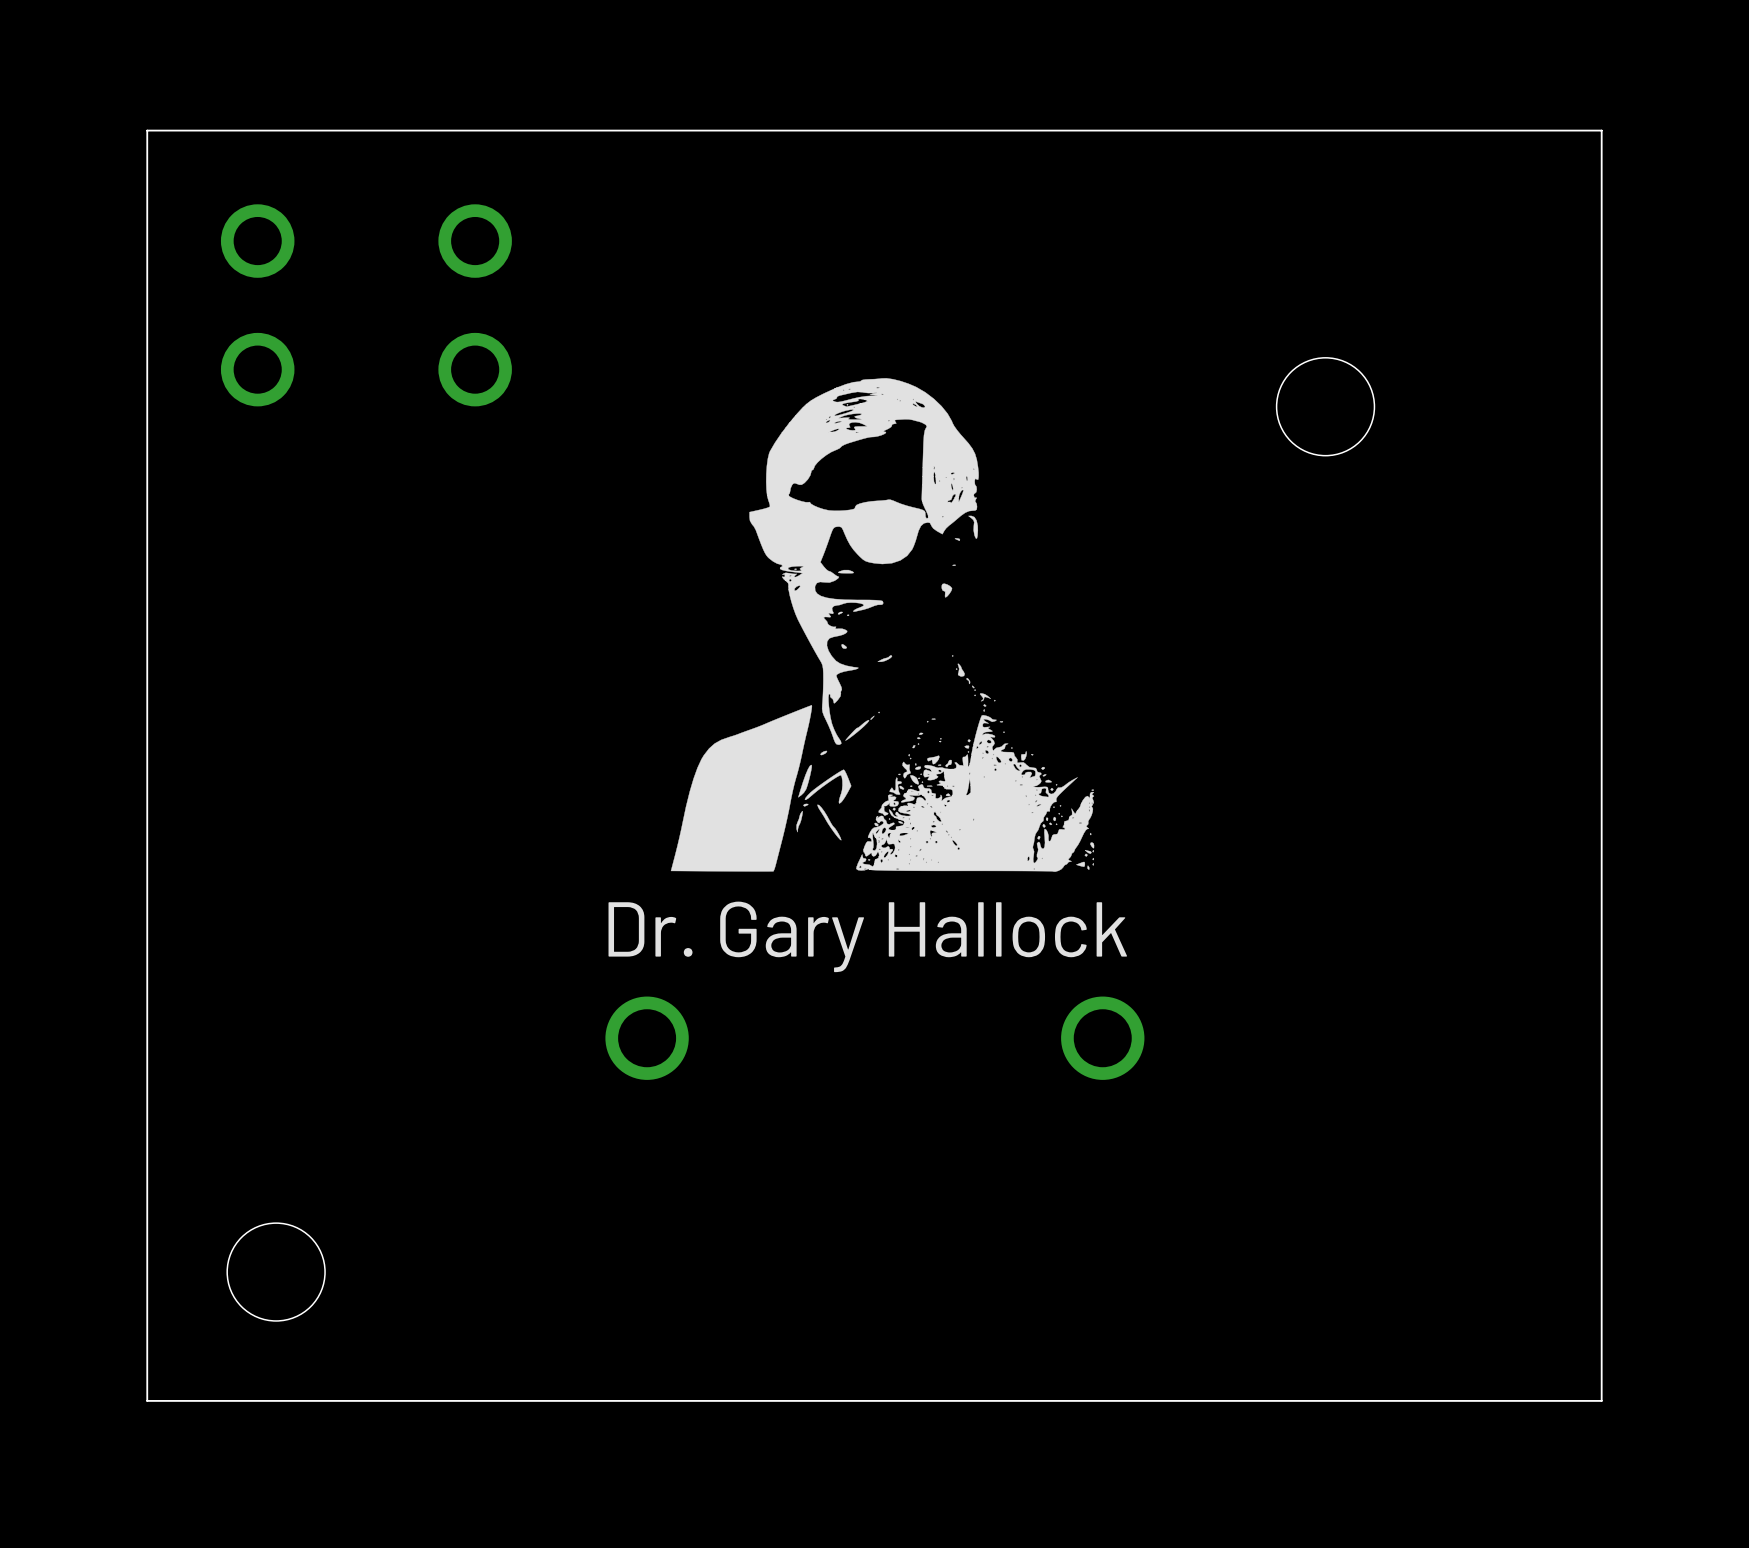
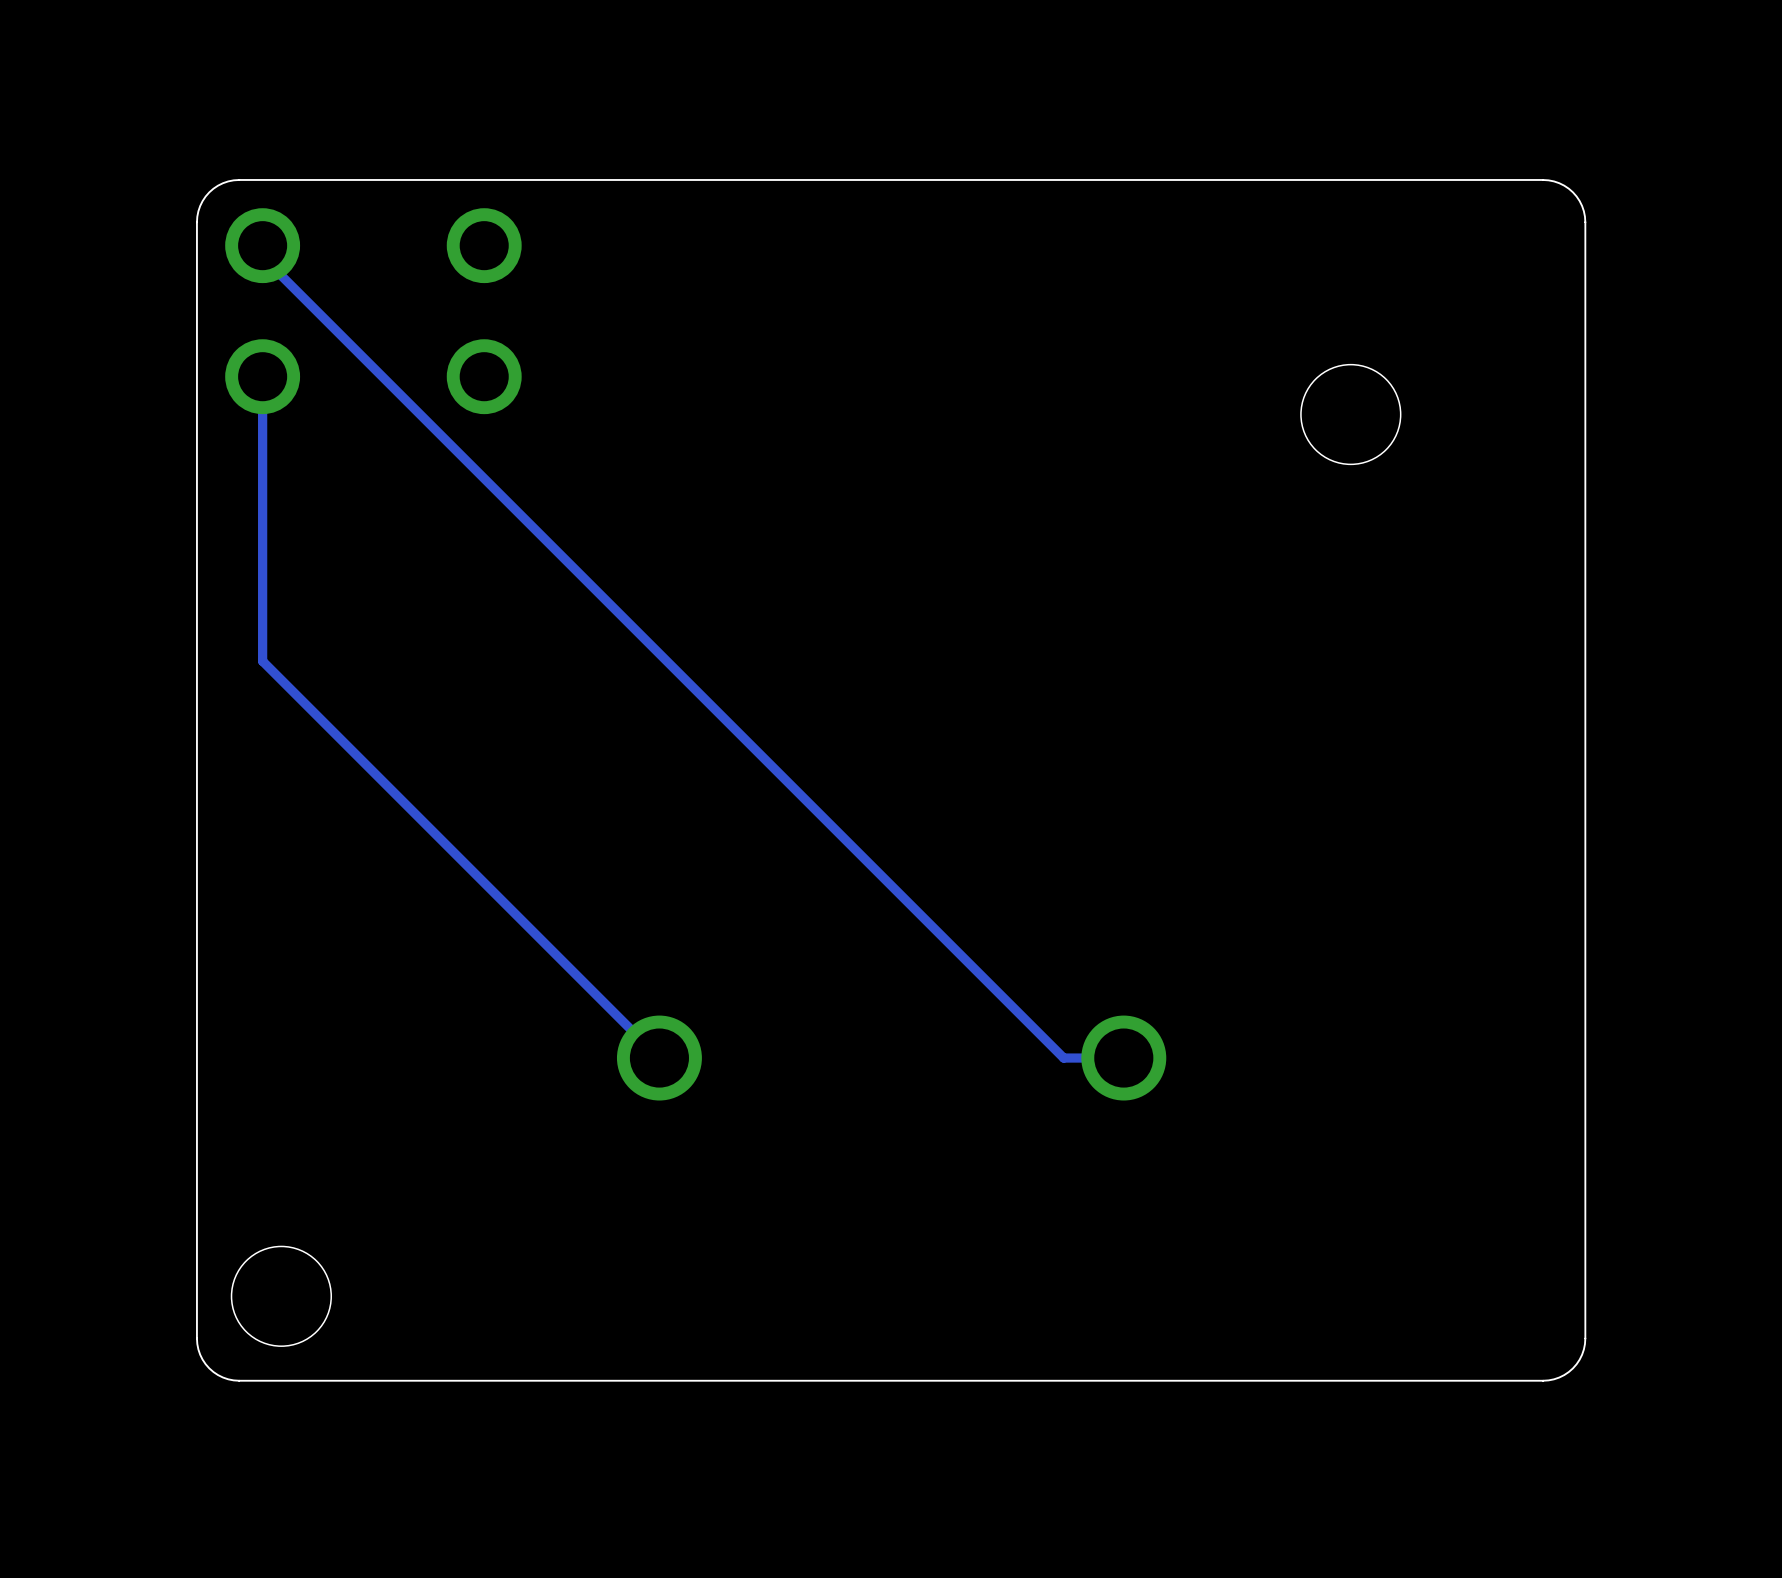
board edge: (1601, 130) (1601, 1400) (147, 1400) (147, 130) (1601, 130) -> (1543, 179) (1559, 183) (1572, 192) (1582, 206) (1585, 222) (1585, 1338) (1582, 1354) (1572, 1368) (1559, 1377) (1543, 1380) (239, 1380) (223, 1377) (209, 1368) (200, 1354) (196, 1338) (196, 222) (200, 206) (209, 192) (223, 183) (239, 179) (1543, 179)
track: none -> (262, 245) (262, 256) (1063, 1058) (1123, 1058)
track: none -> (262, 376) (262, 661) (659, 1058)
drawing: [670, 378, 1095, 872] -> none
text: Dr. Gary Hallock (867, 936) -> none

